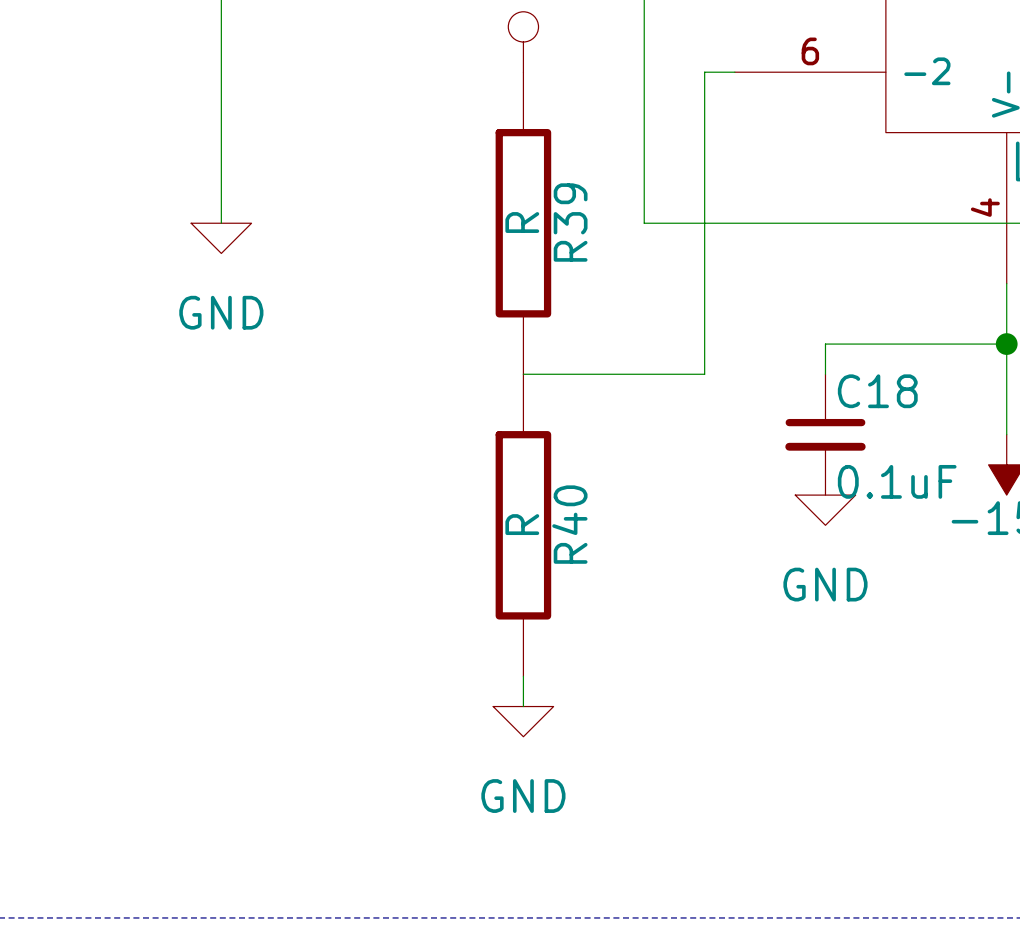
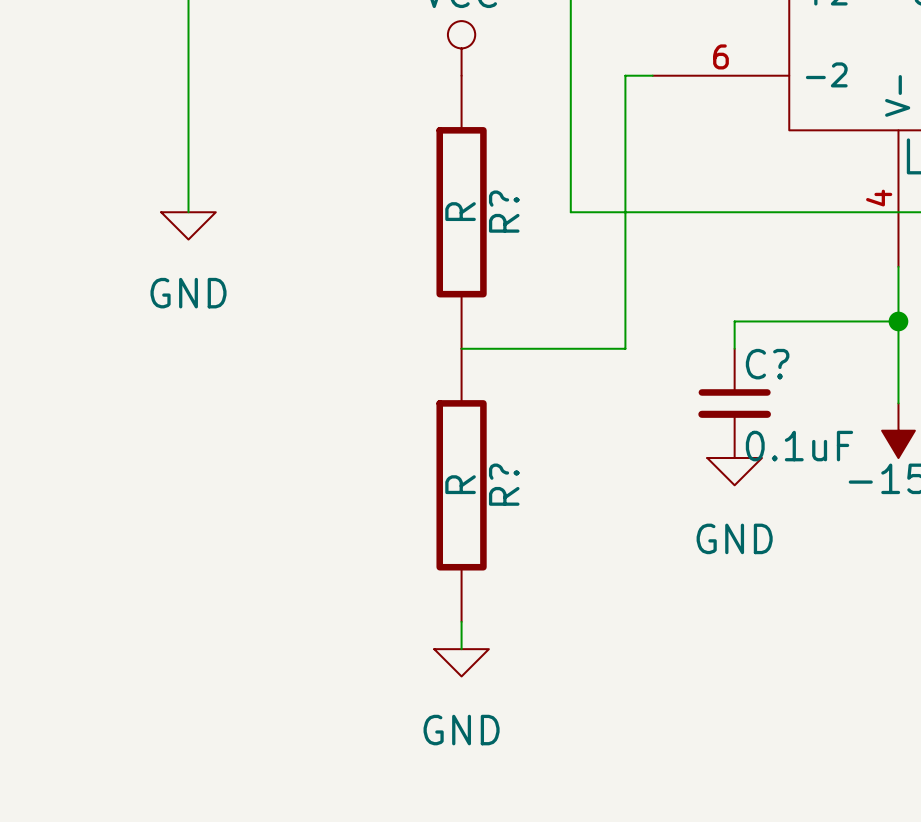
R39 name: R39 (570, 222) -> R? (504, 211)
C18 name: C18 (877, 391) -> C? (767, 364)
R40 name: R40 (569, 524) -> R? (504, 484)

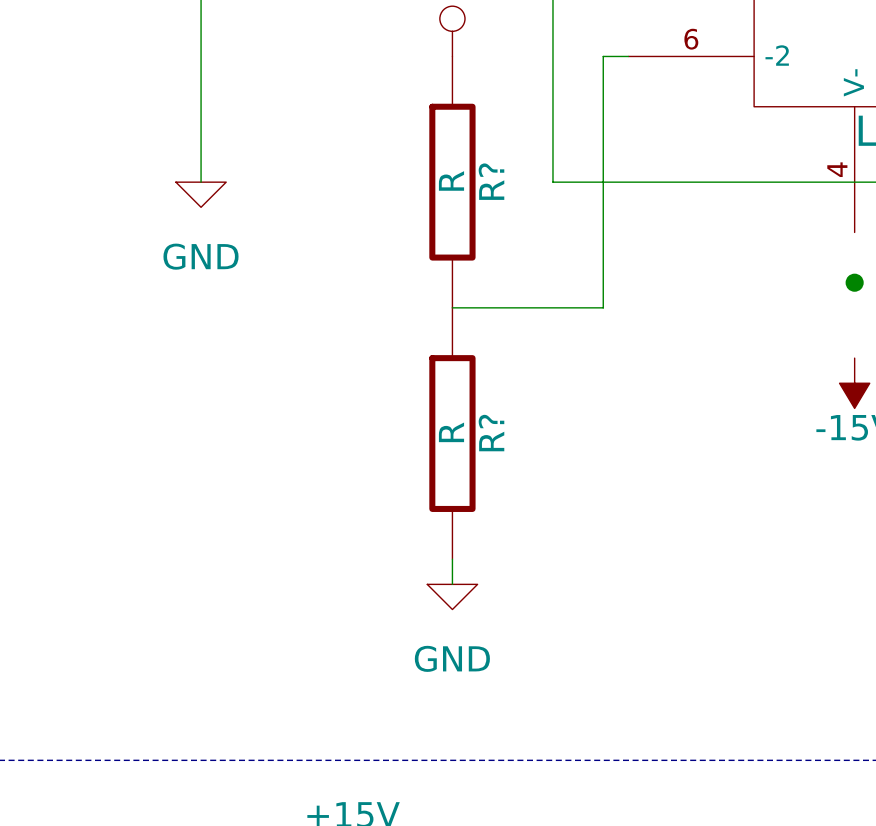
wire: (898, 266) (898, 403) -> none
wire: (898, 321) (734, 321) (734, 348) -> none
C?: 0.1uF (734, 403) -> none
power symbol: GND (734, 471) -> none

